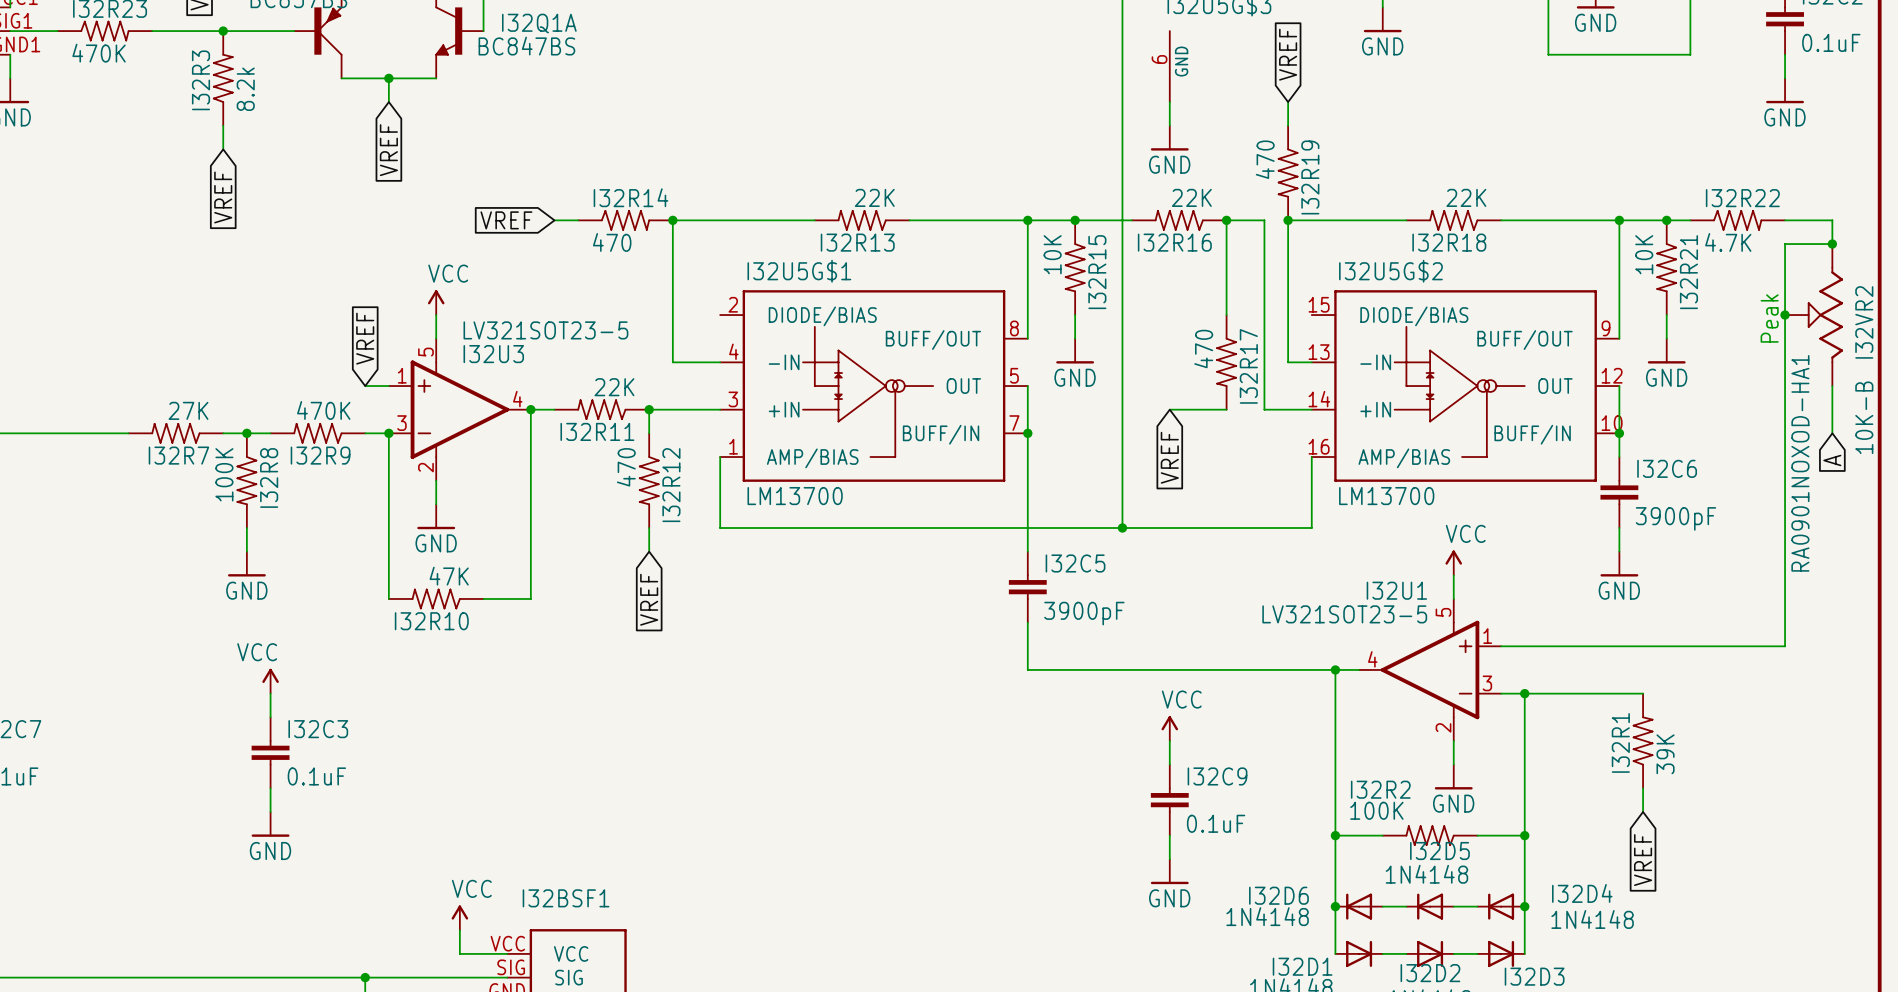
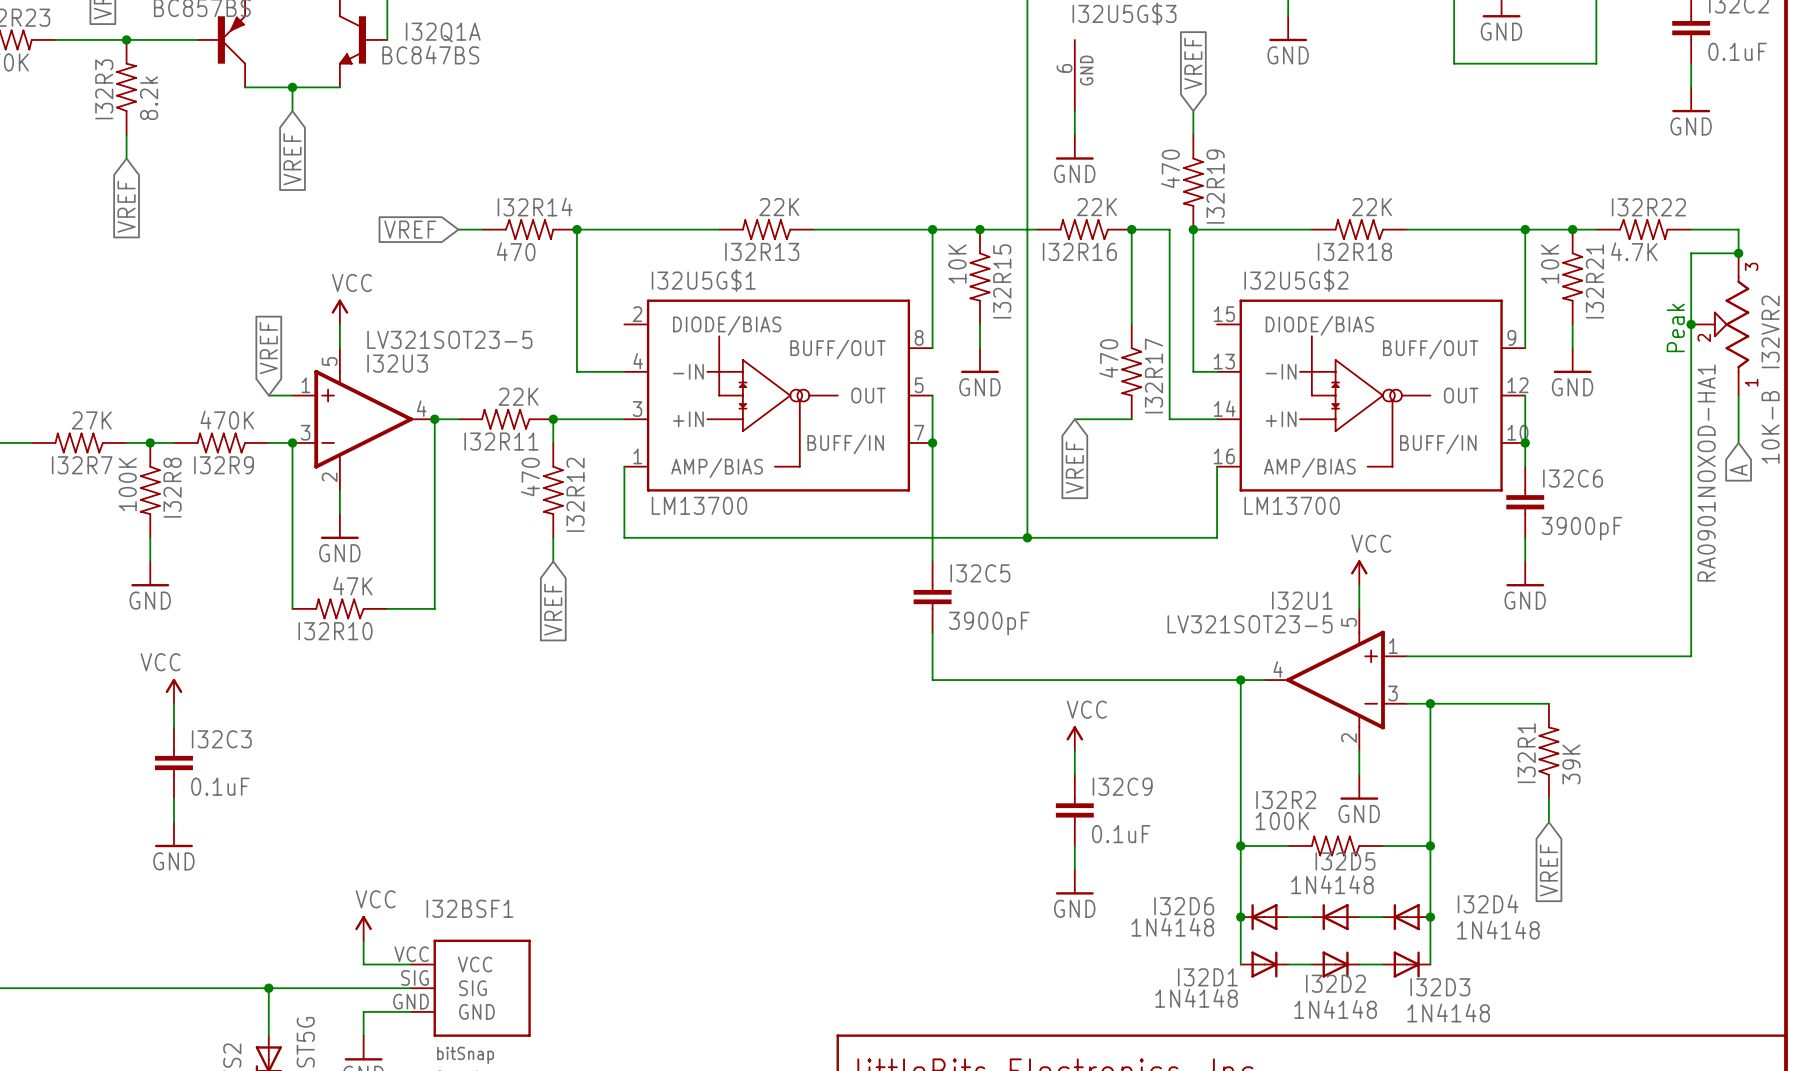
I32VR2 text: none -> 3 (1751, 266)
I32VR2 text: none -> 2 (1704, 337)
I32VR2 text: none -> 1 (1751, 382)

